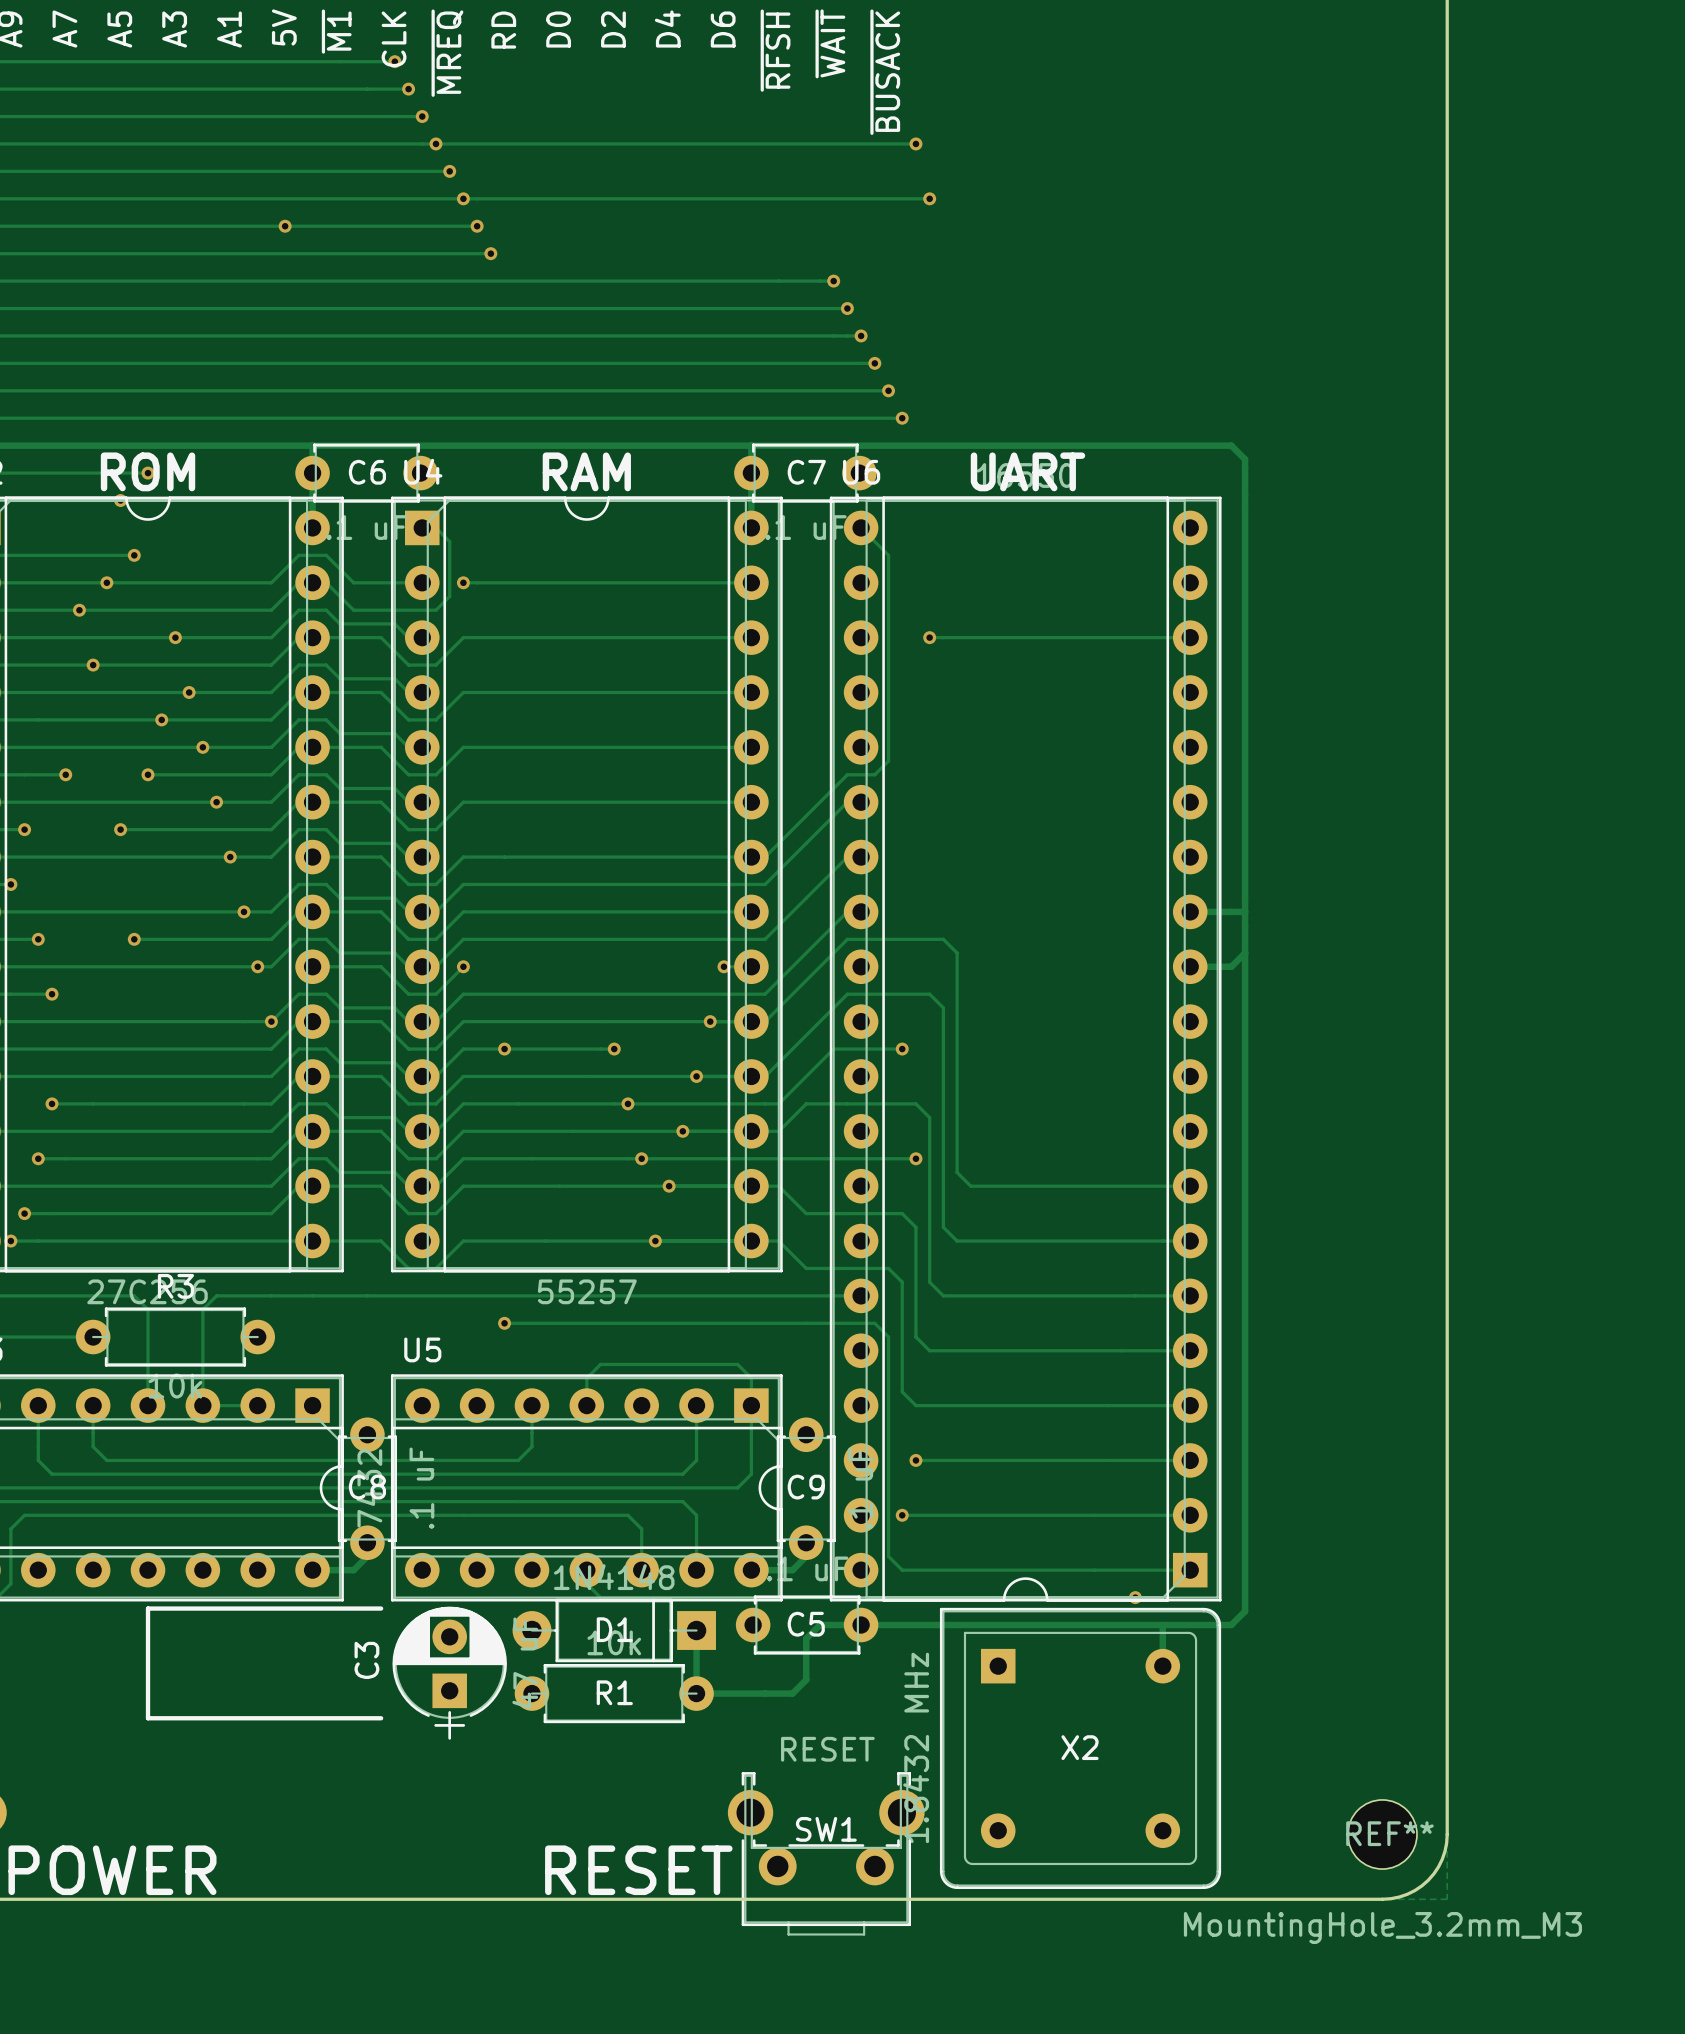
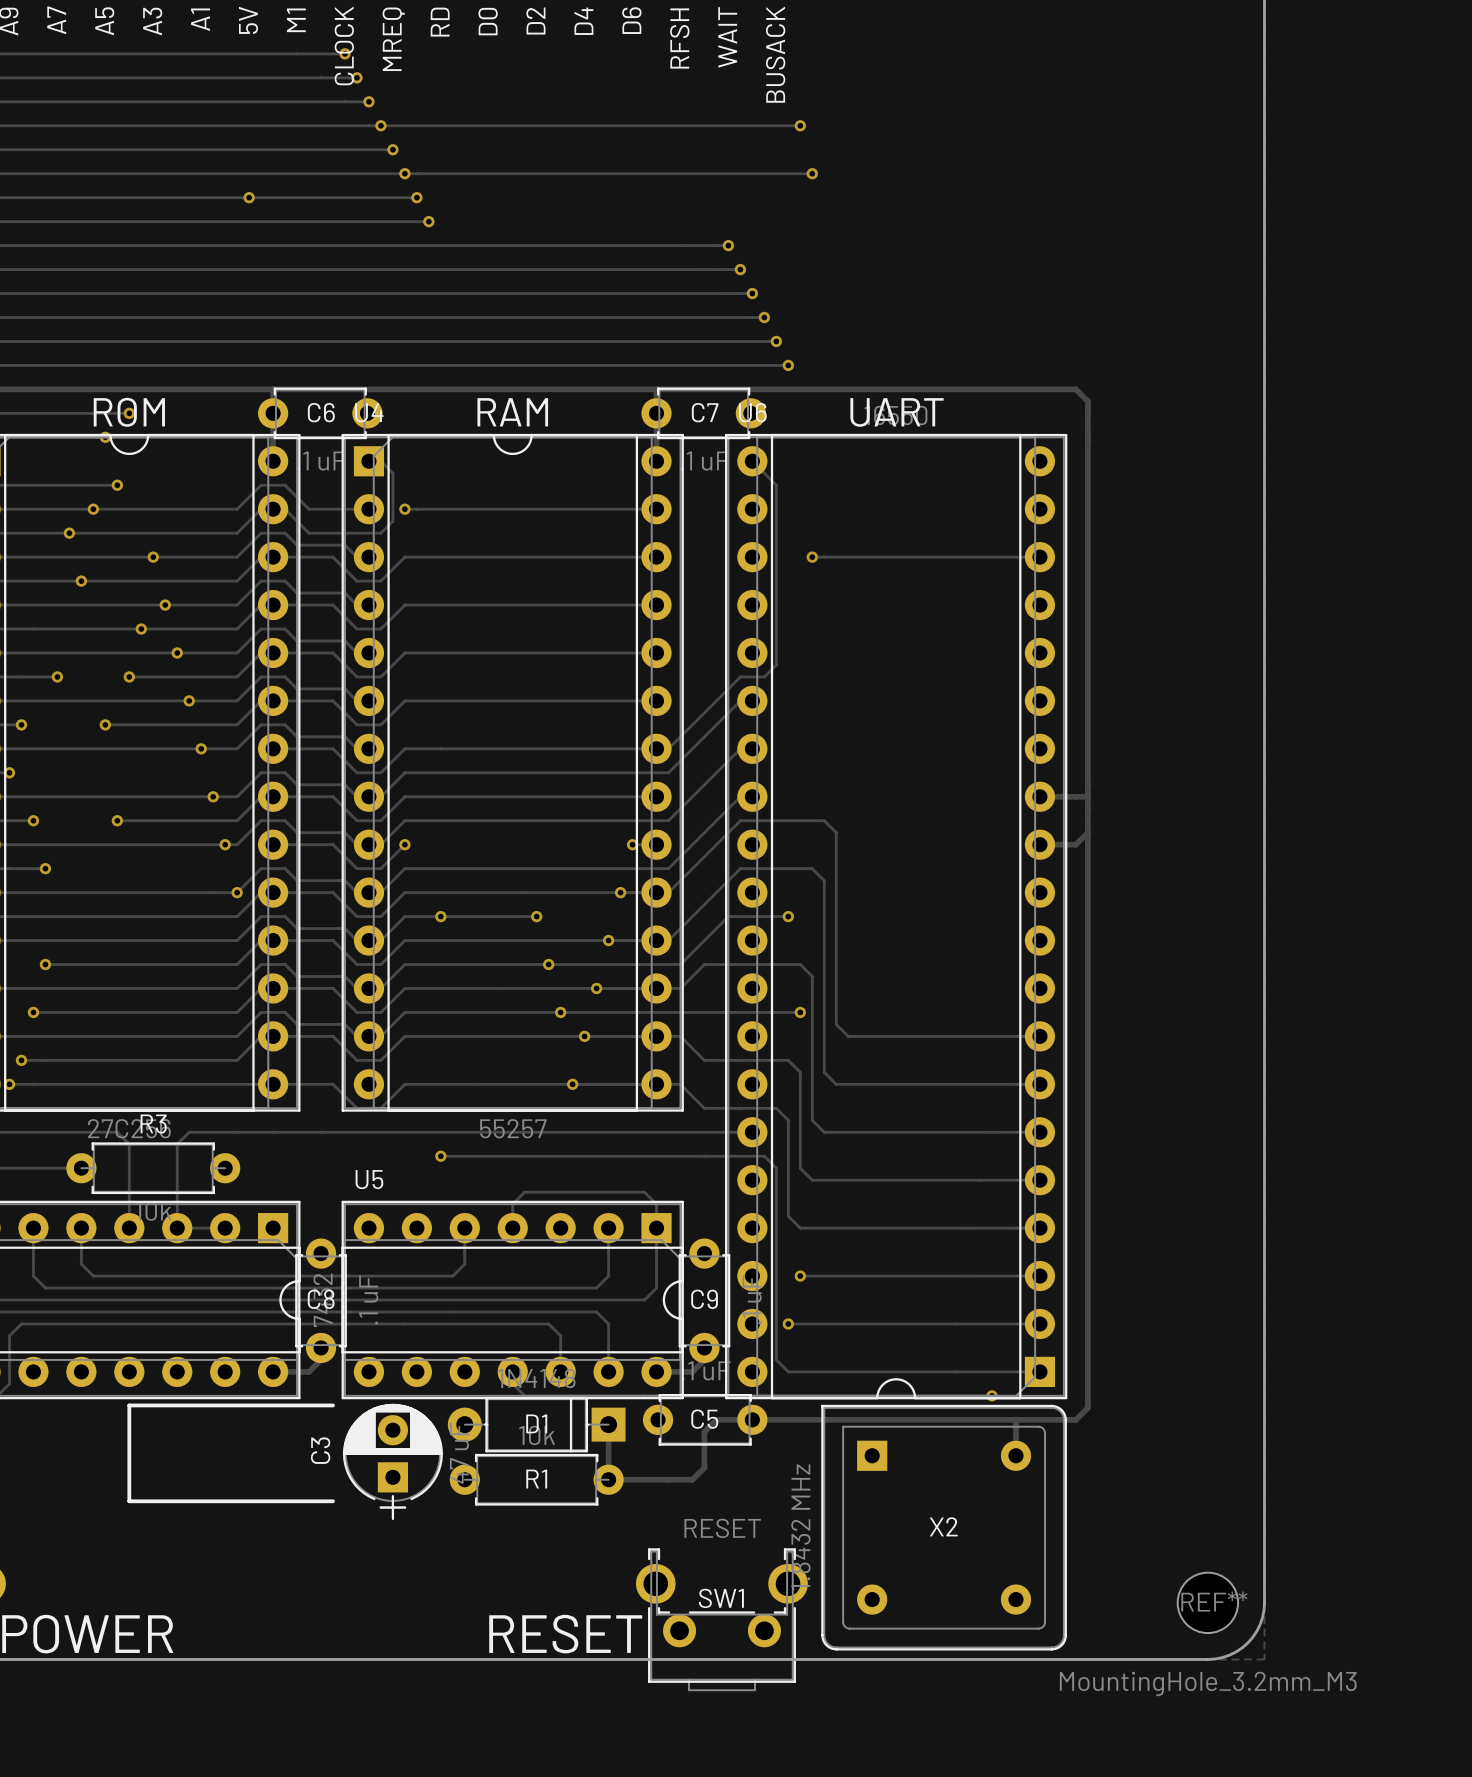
text: ~{M1} (336, 31) -> M1 (296, 20)
text: CLK (394, 39) -> CLOCK (344, 45)
text: ~{WAIT} (830, 43) -> WAIT (727, 37)
text: ~{RFSH} (775, 50) -> RFSH (679, 38)
text: ~{MREQ} (447, 53) -> MREQ (393, 39)
text: ~{BUSACK} (885, 72) -> BUSACK (775, 54)

